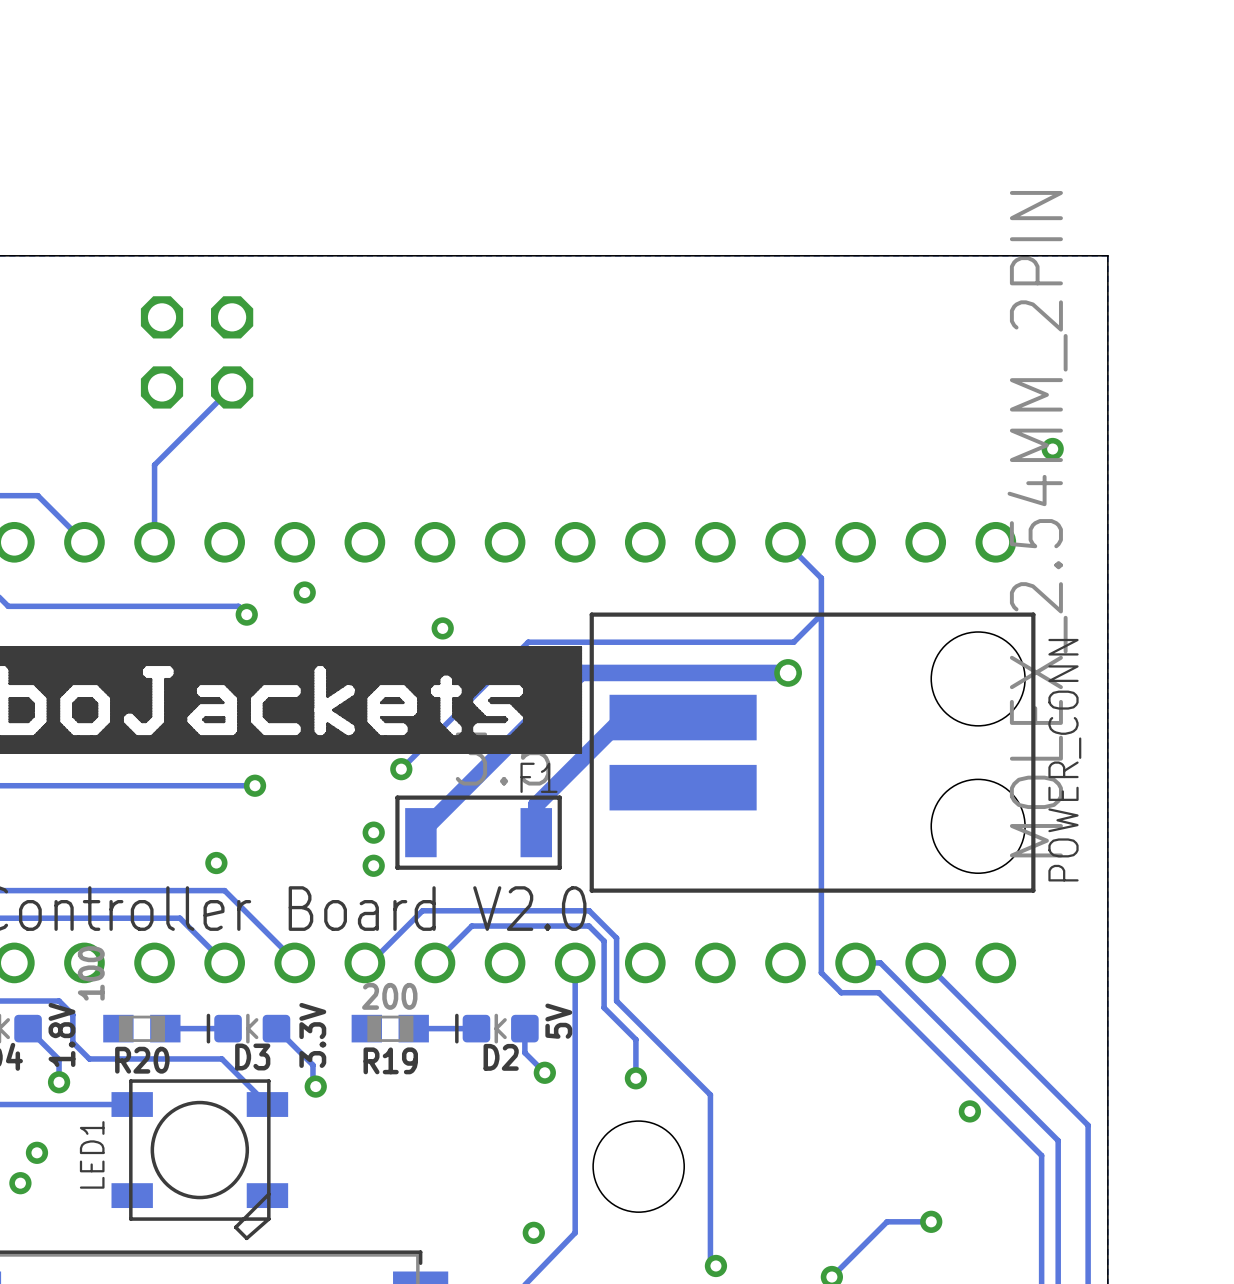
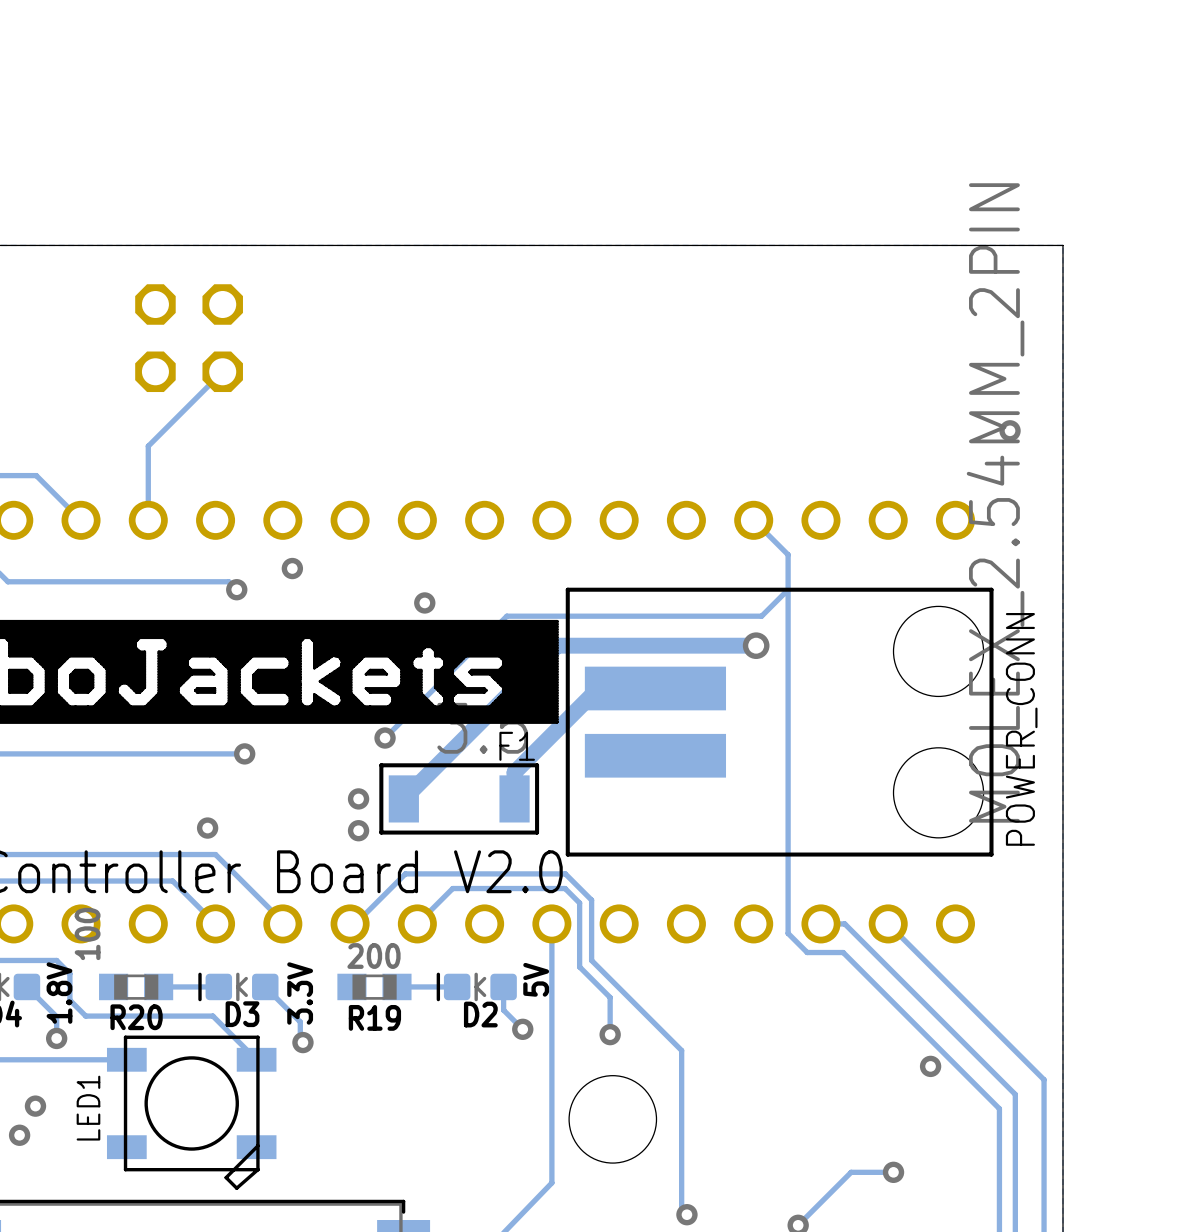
via: (533, 1232) -> none

